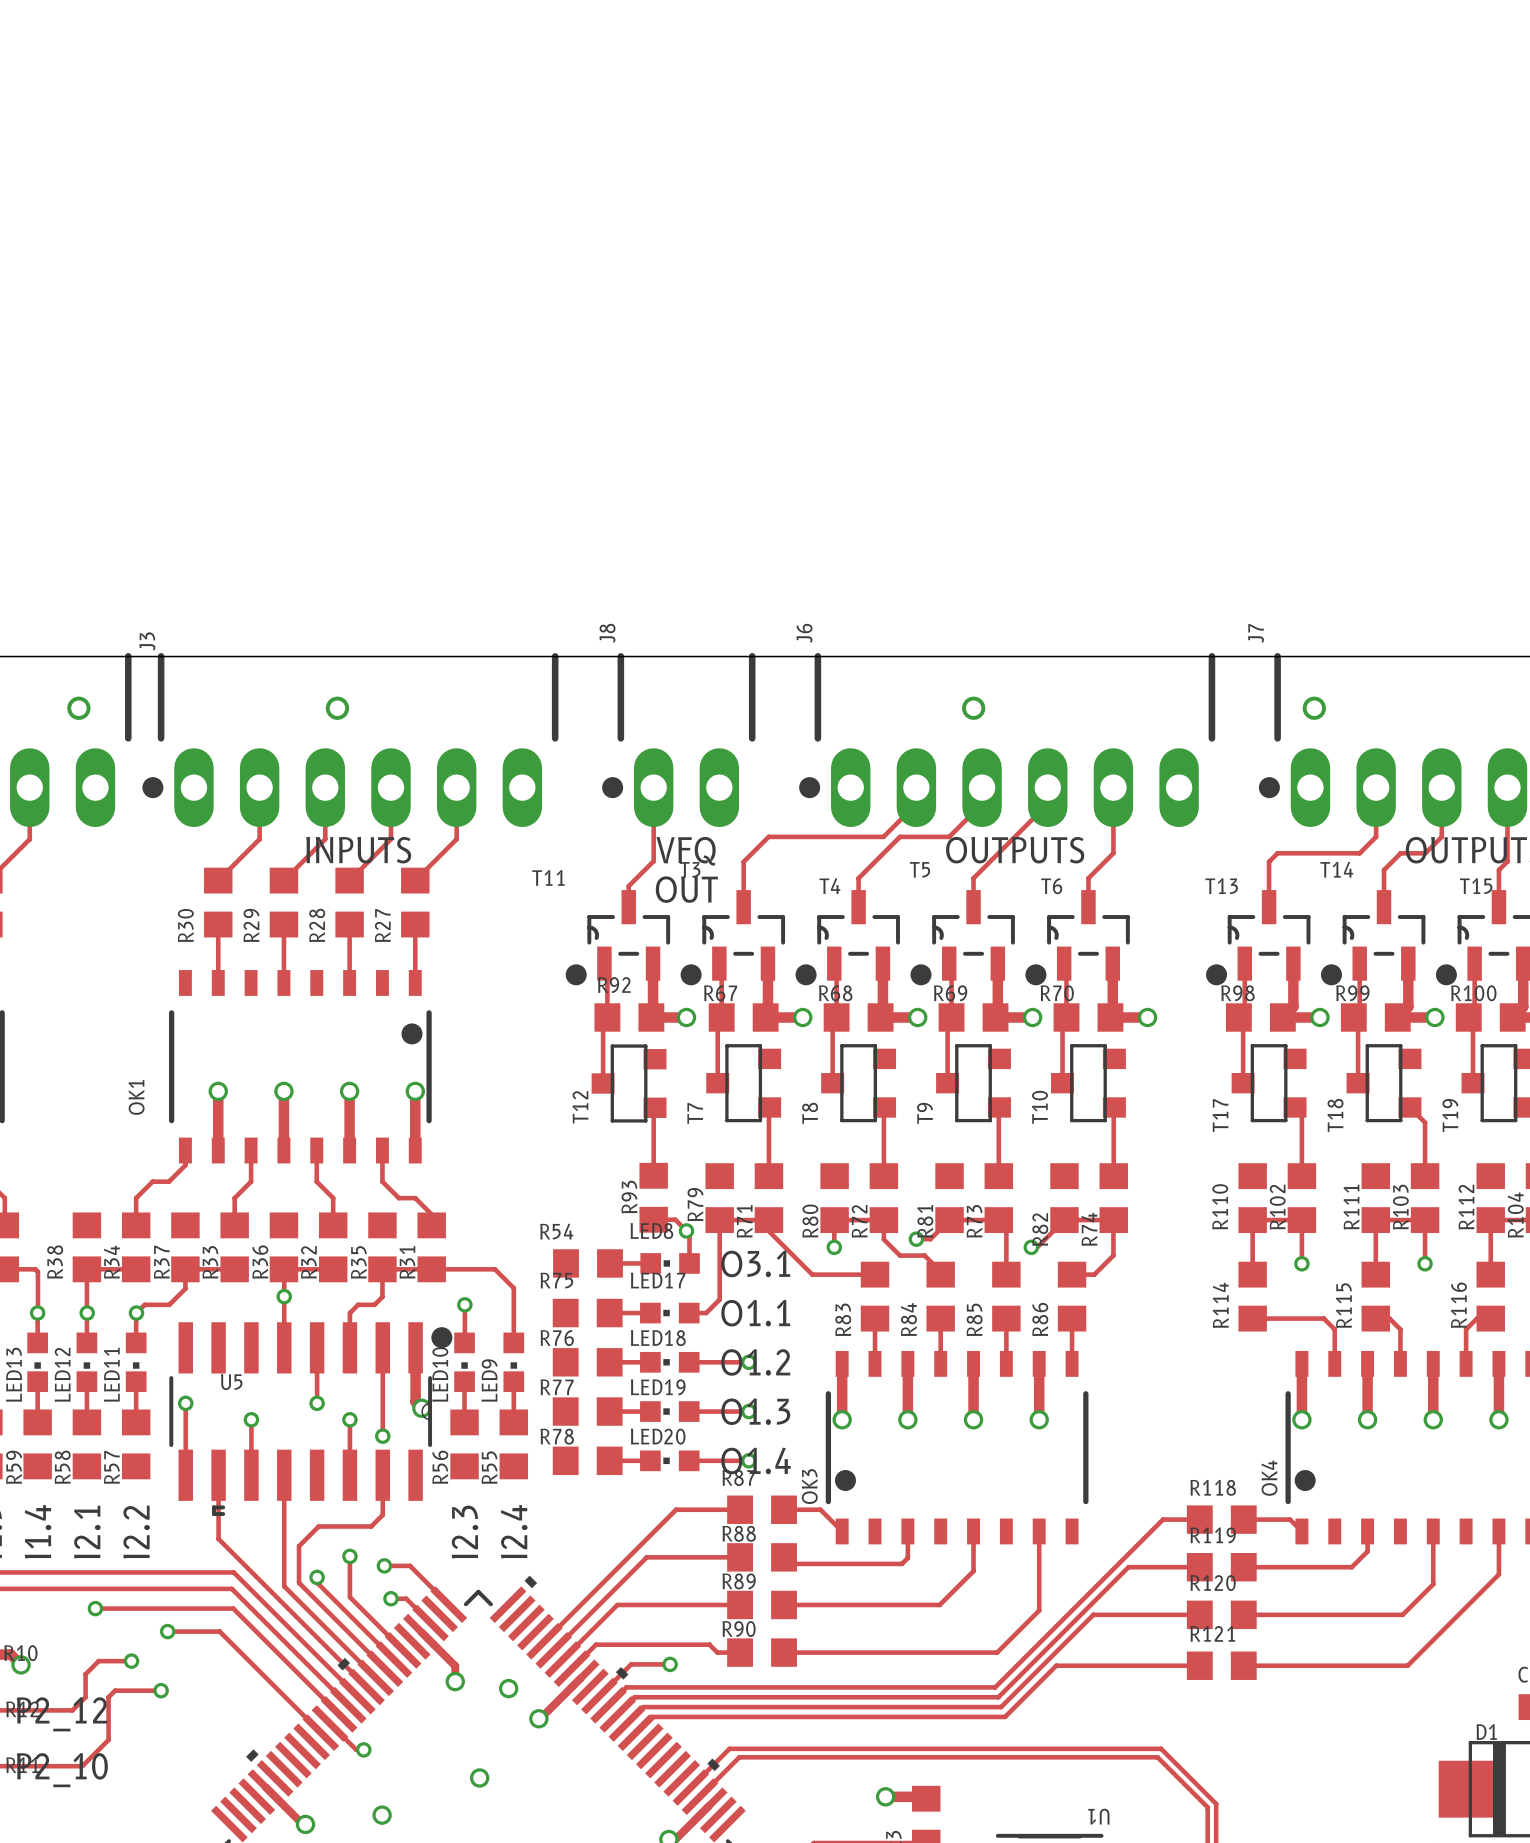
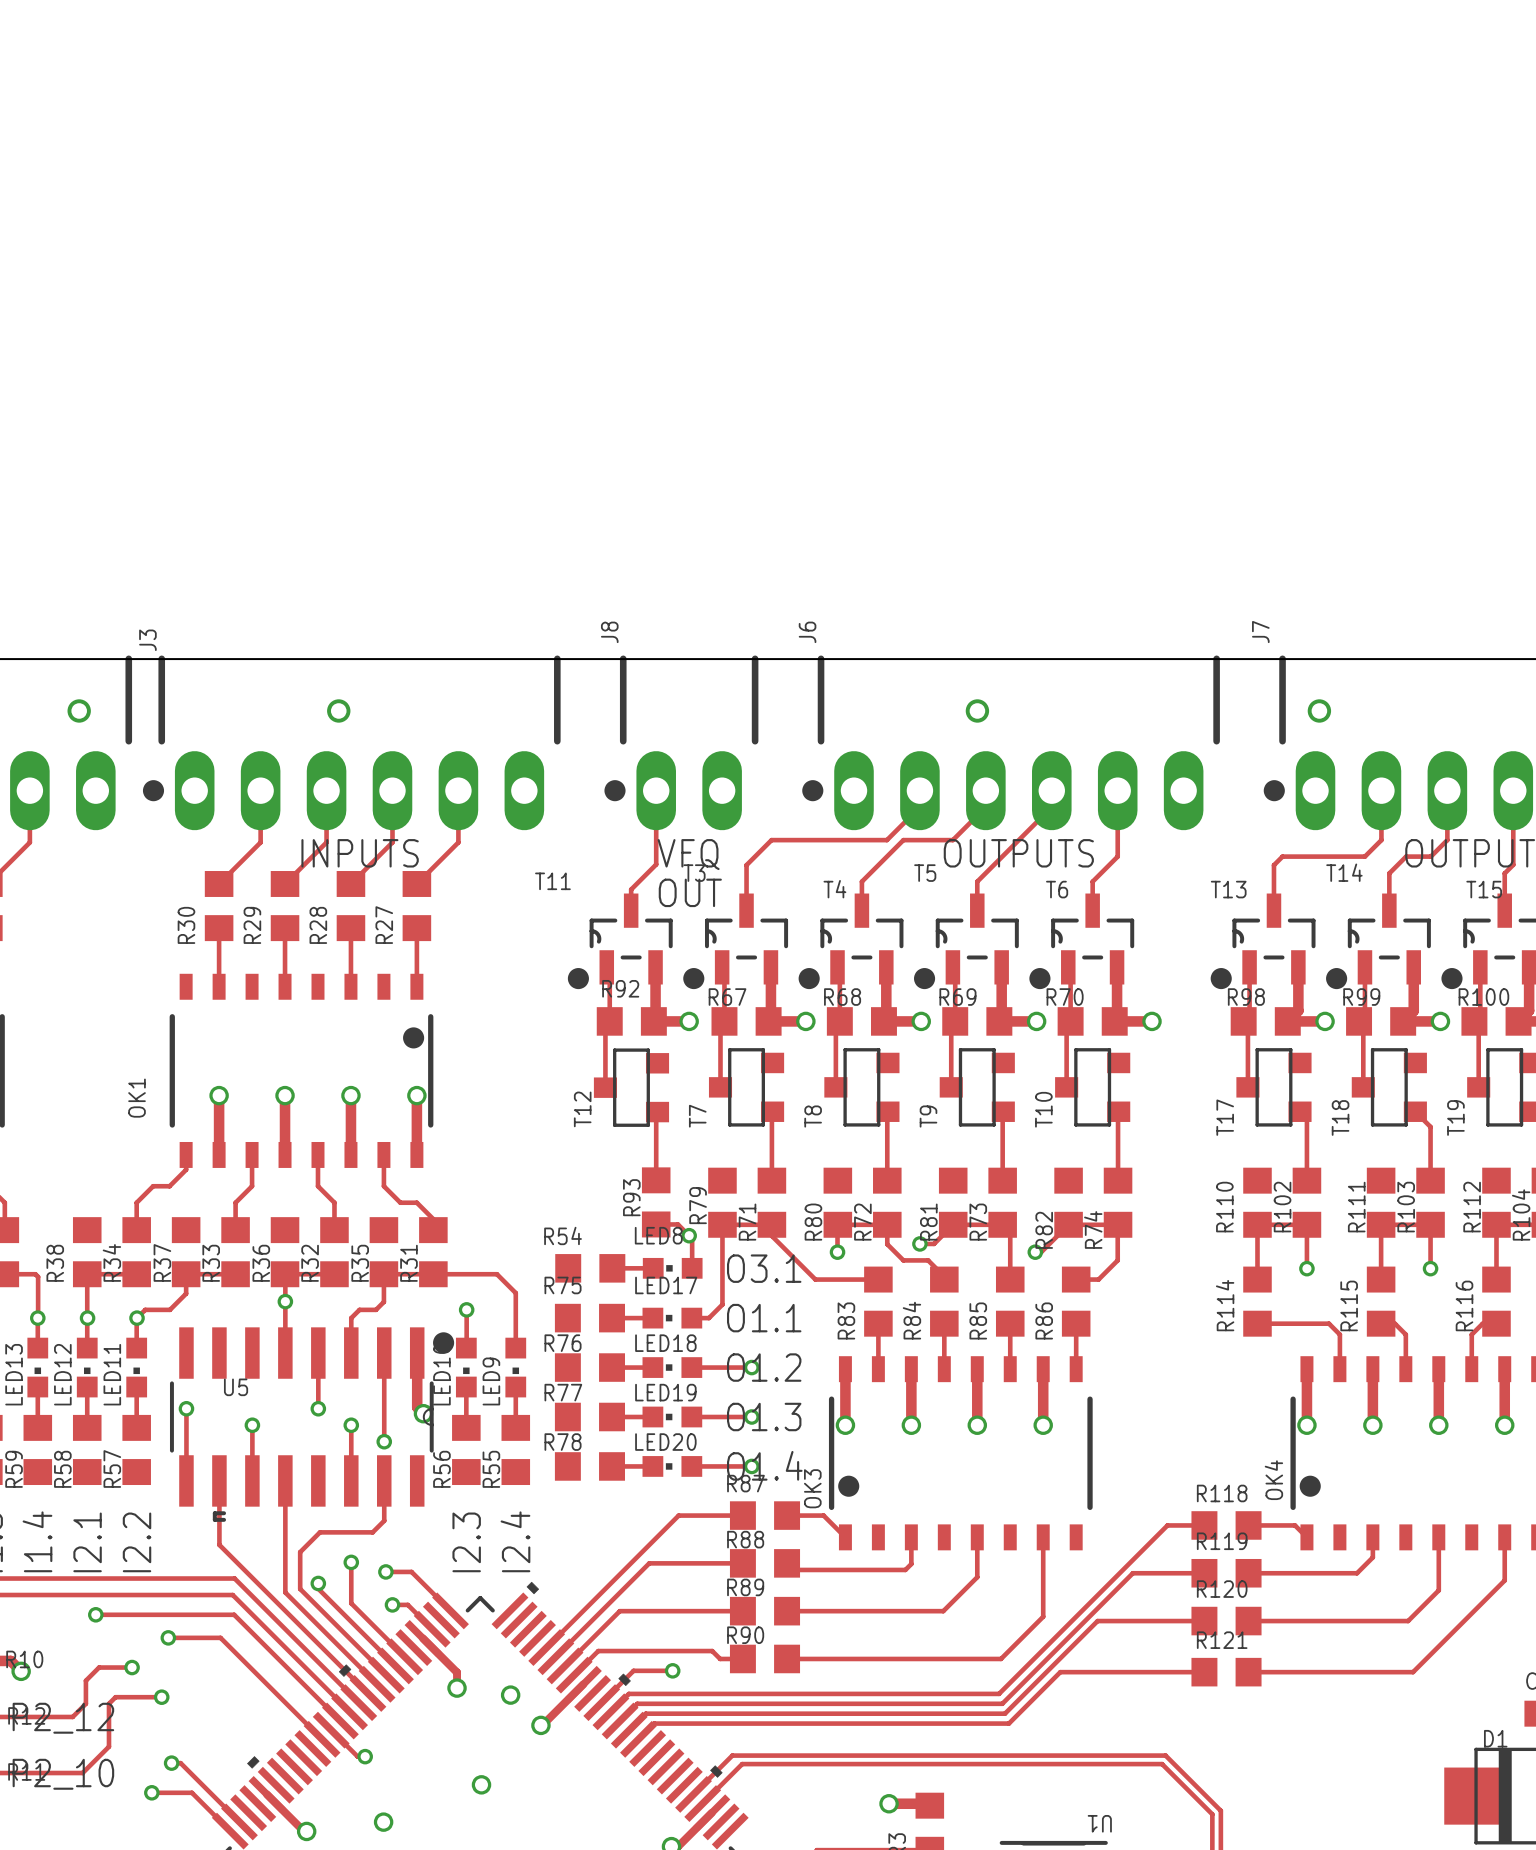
track: none -> (171, 1763) (180, 1763) (239, 1821)
via: none -> (171, 1763)
track: none -> (151, 1792) (191, 1792) (230, 1831)
via: none -> (151, 1792)

